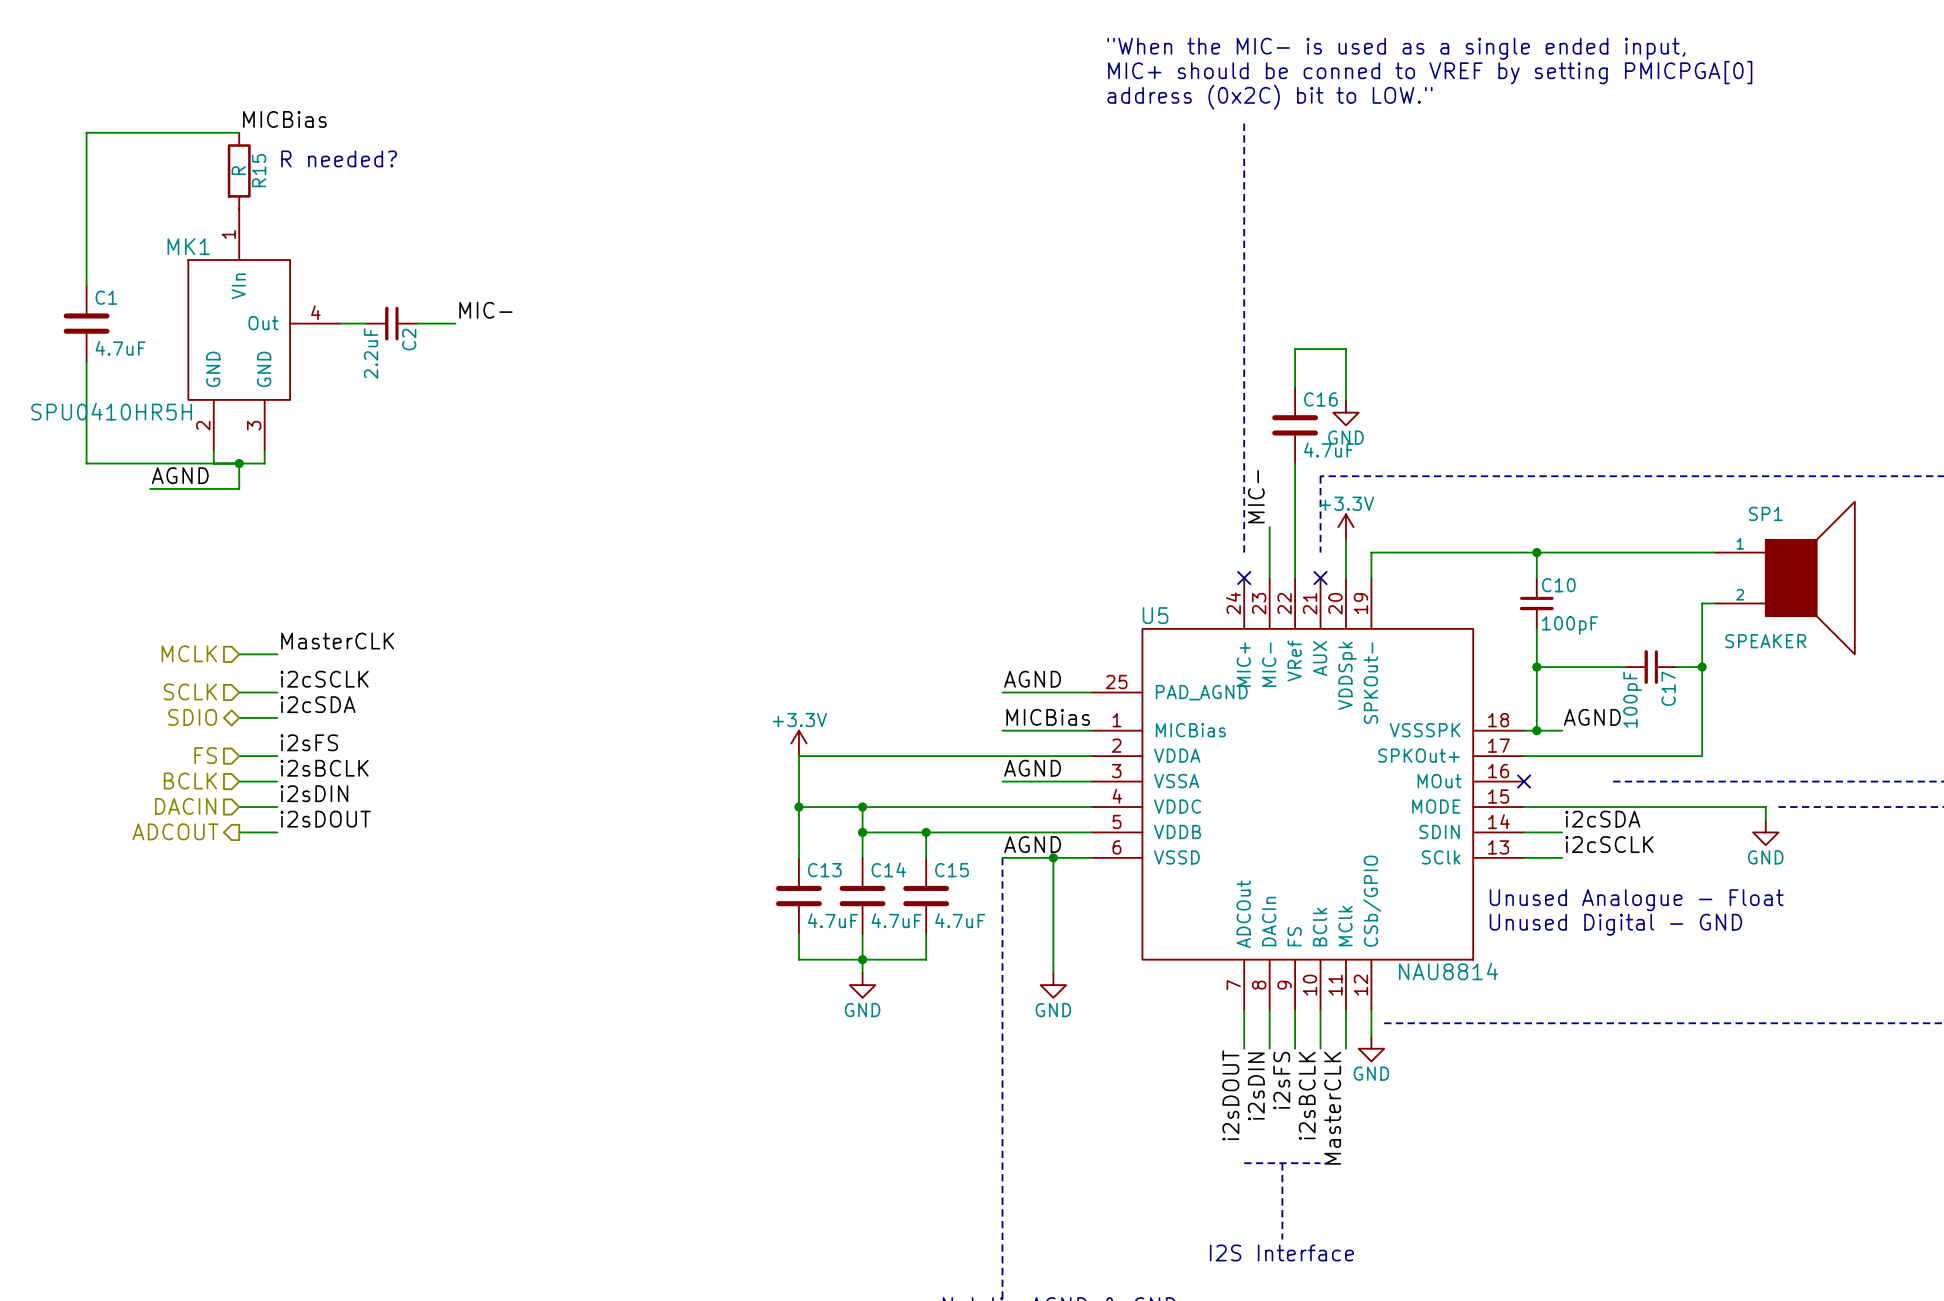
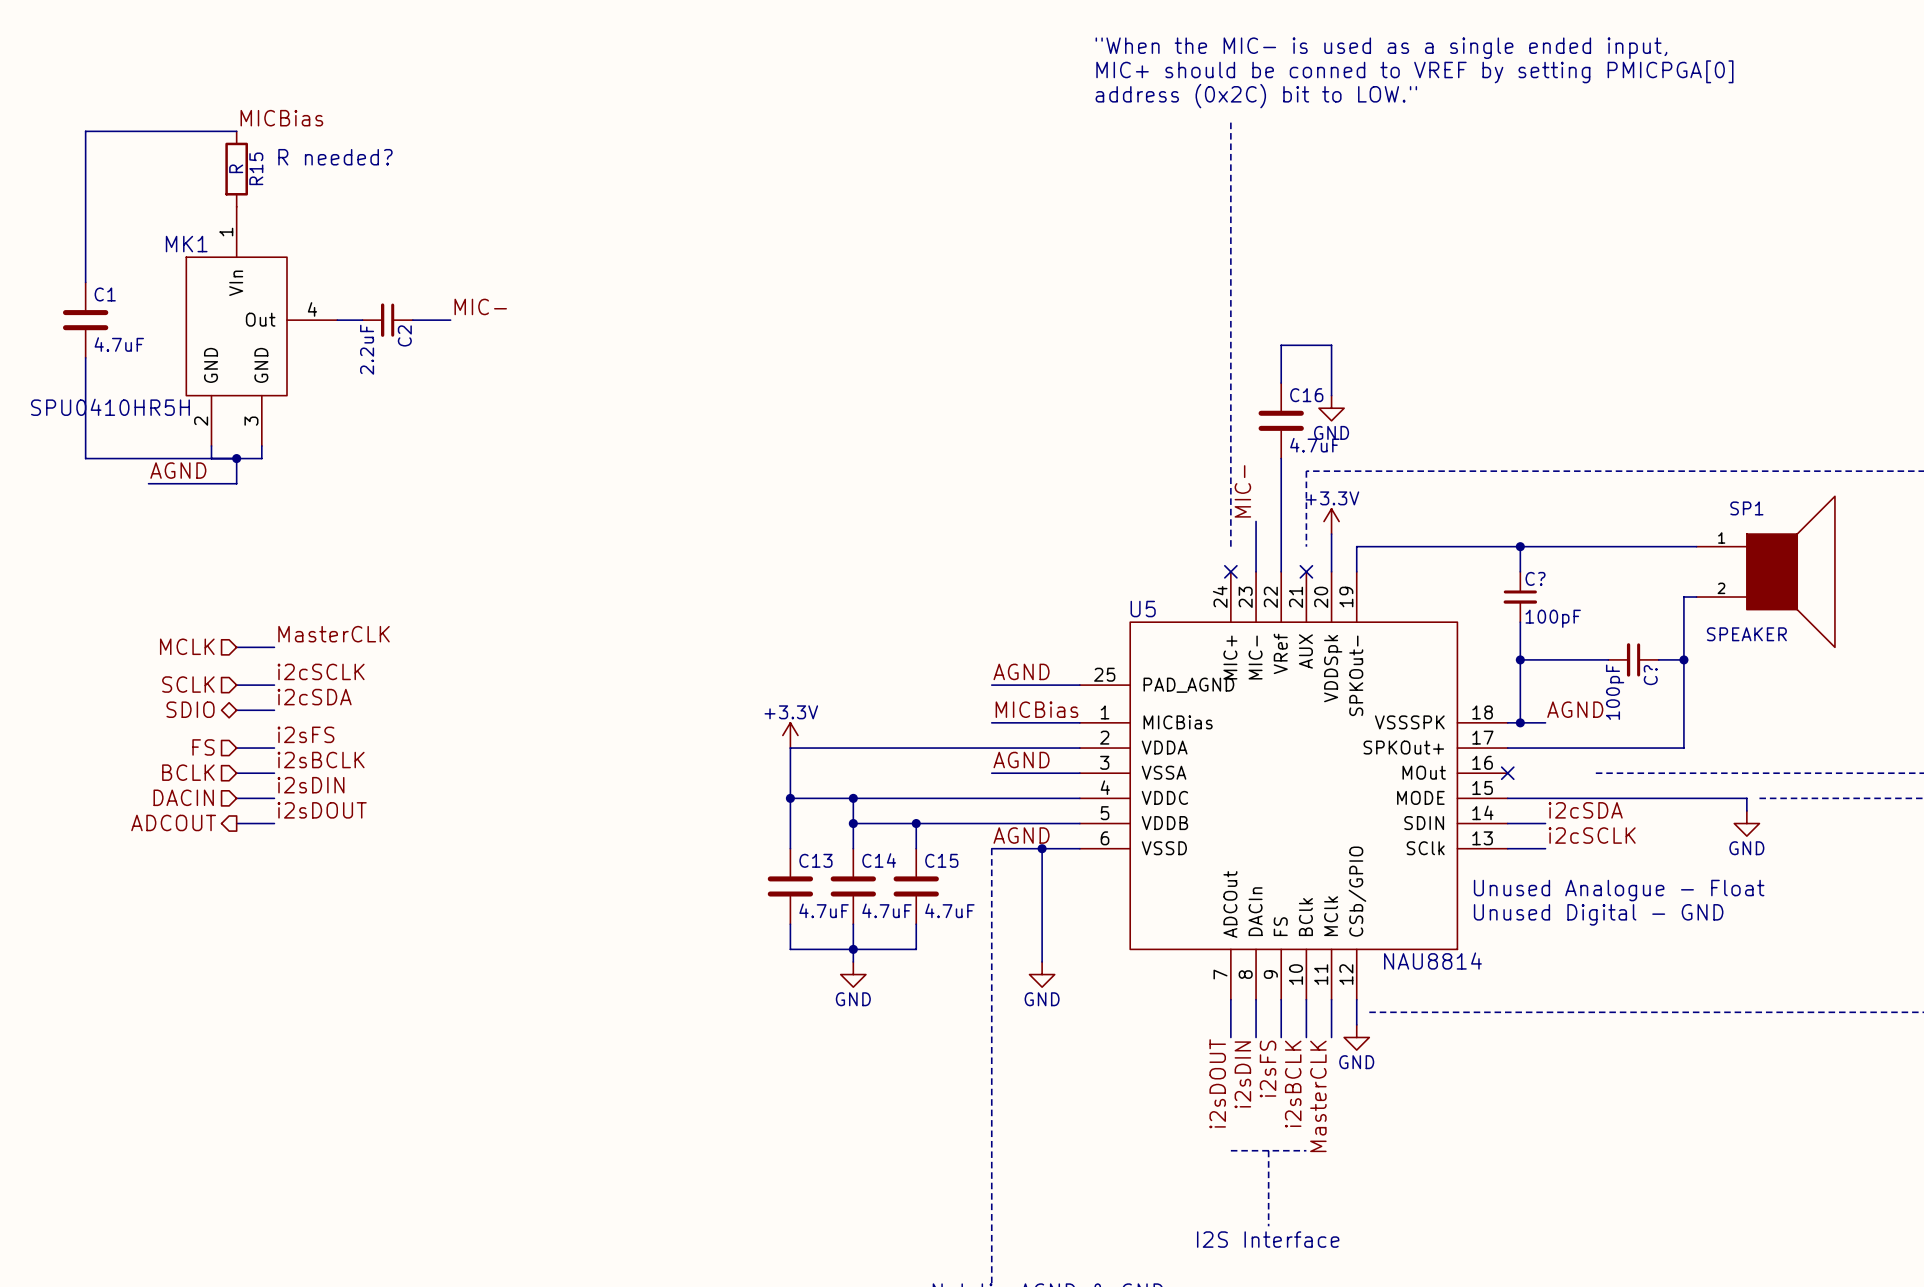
C10 name: C10 (1558, 585) -> C? (1535, 578)
C17 name: C17 (1668, 688) -> C? (1650, 675)

